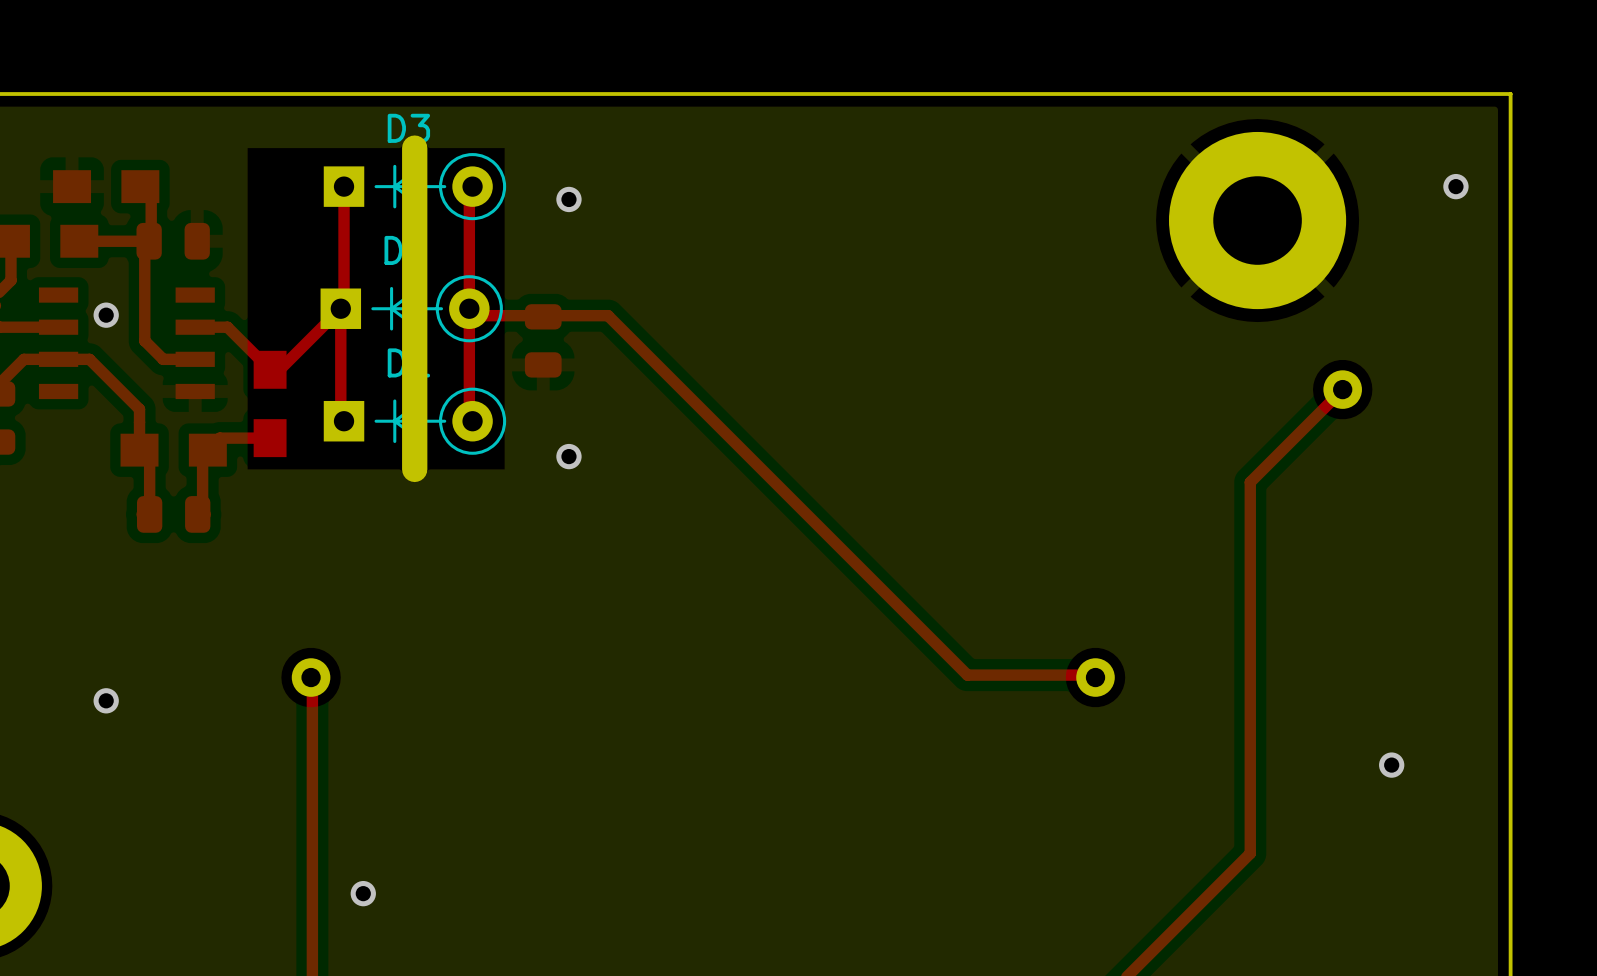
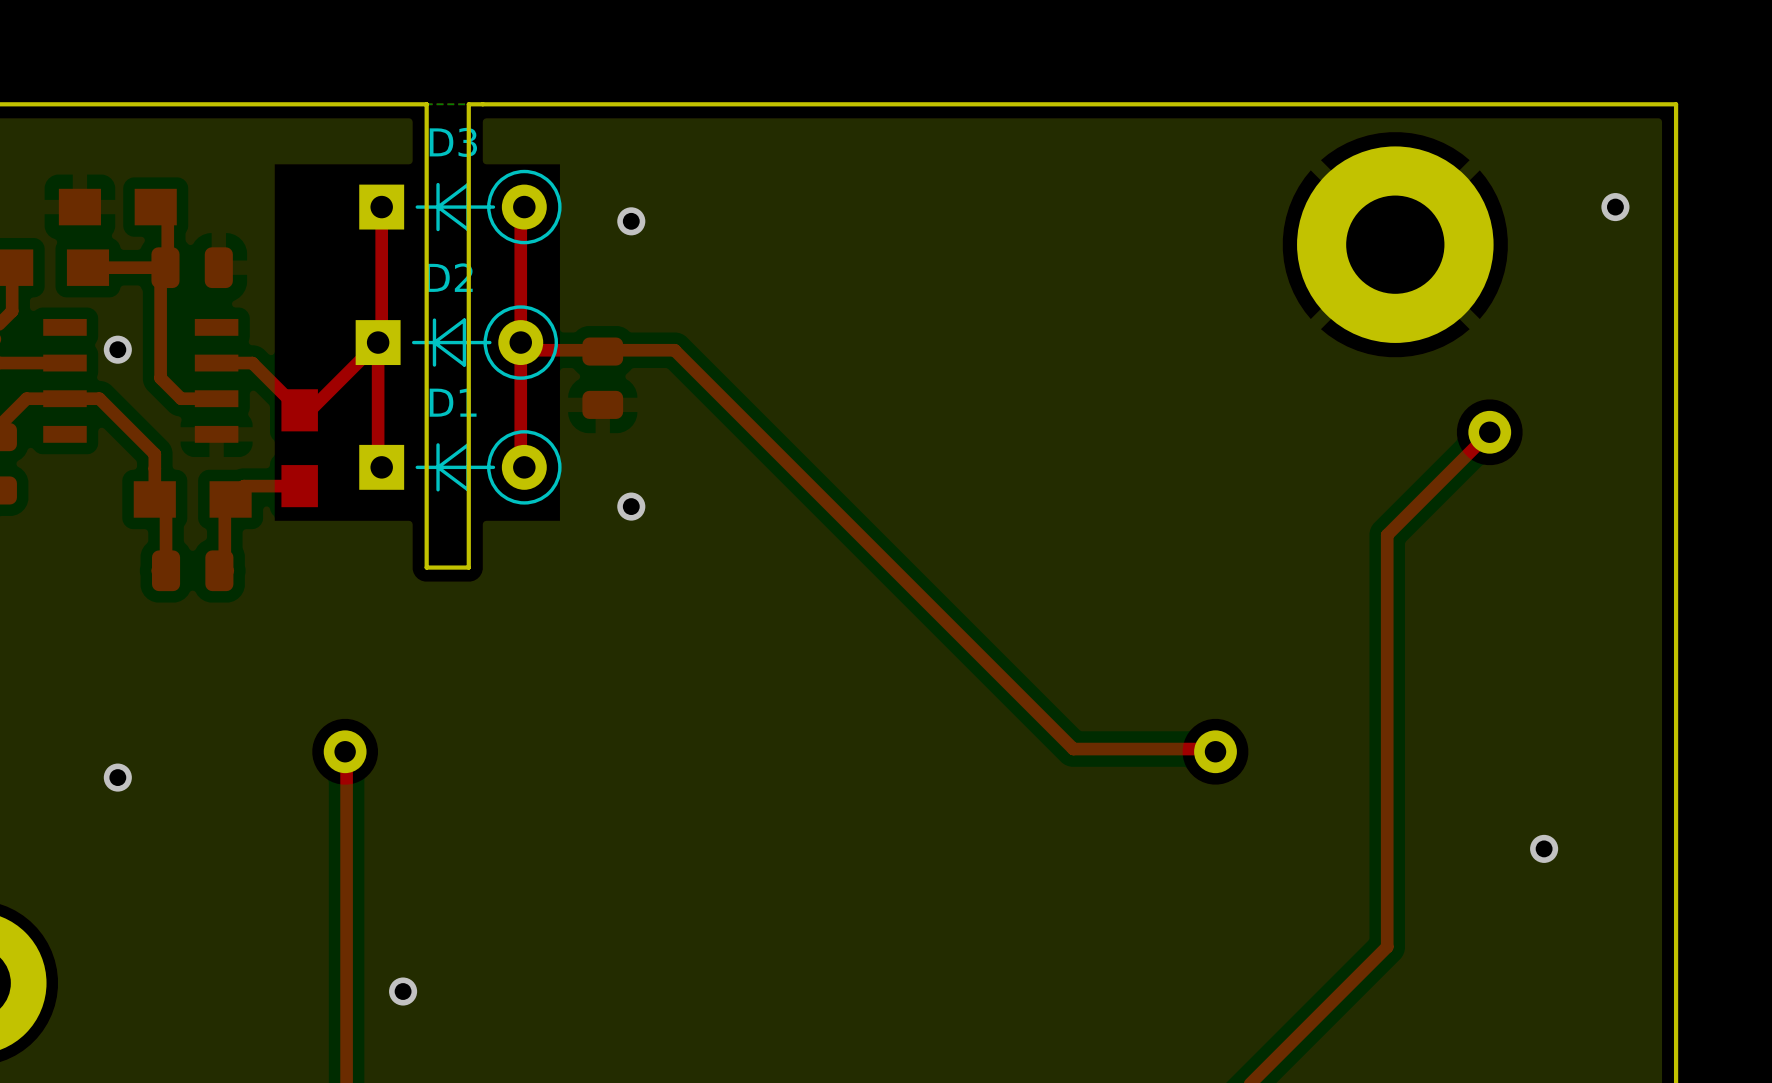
board edge: (422, 94) (384, 94) -> (468, 104) (468, 567) (426, 567) (426, 104)
board edge: (414, 148) (414, 469) -> none

